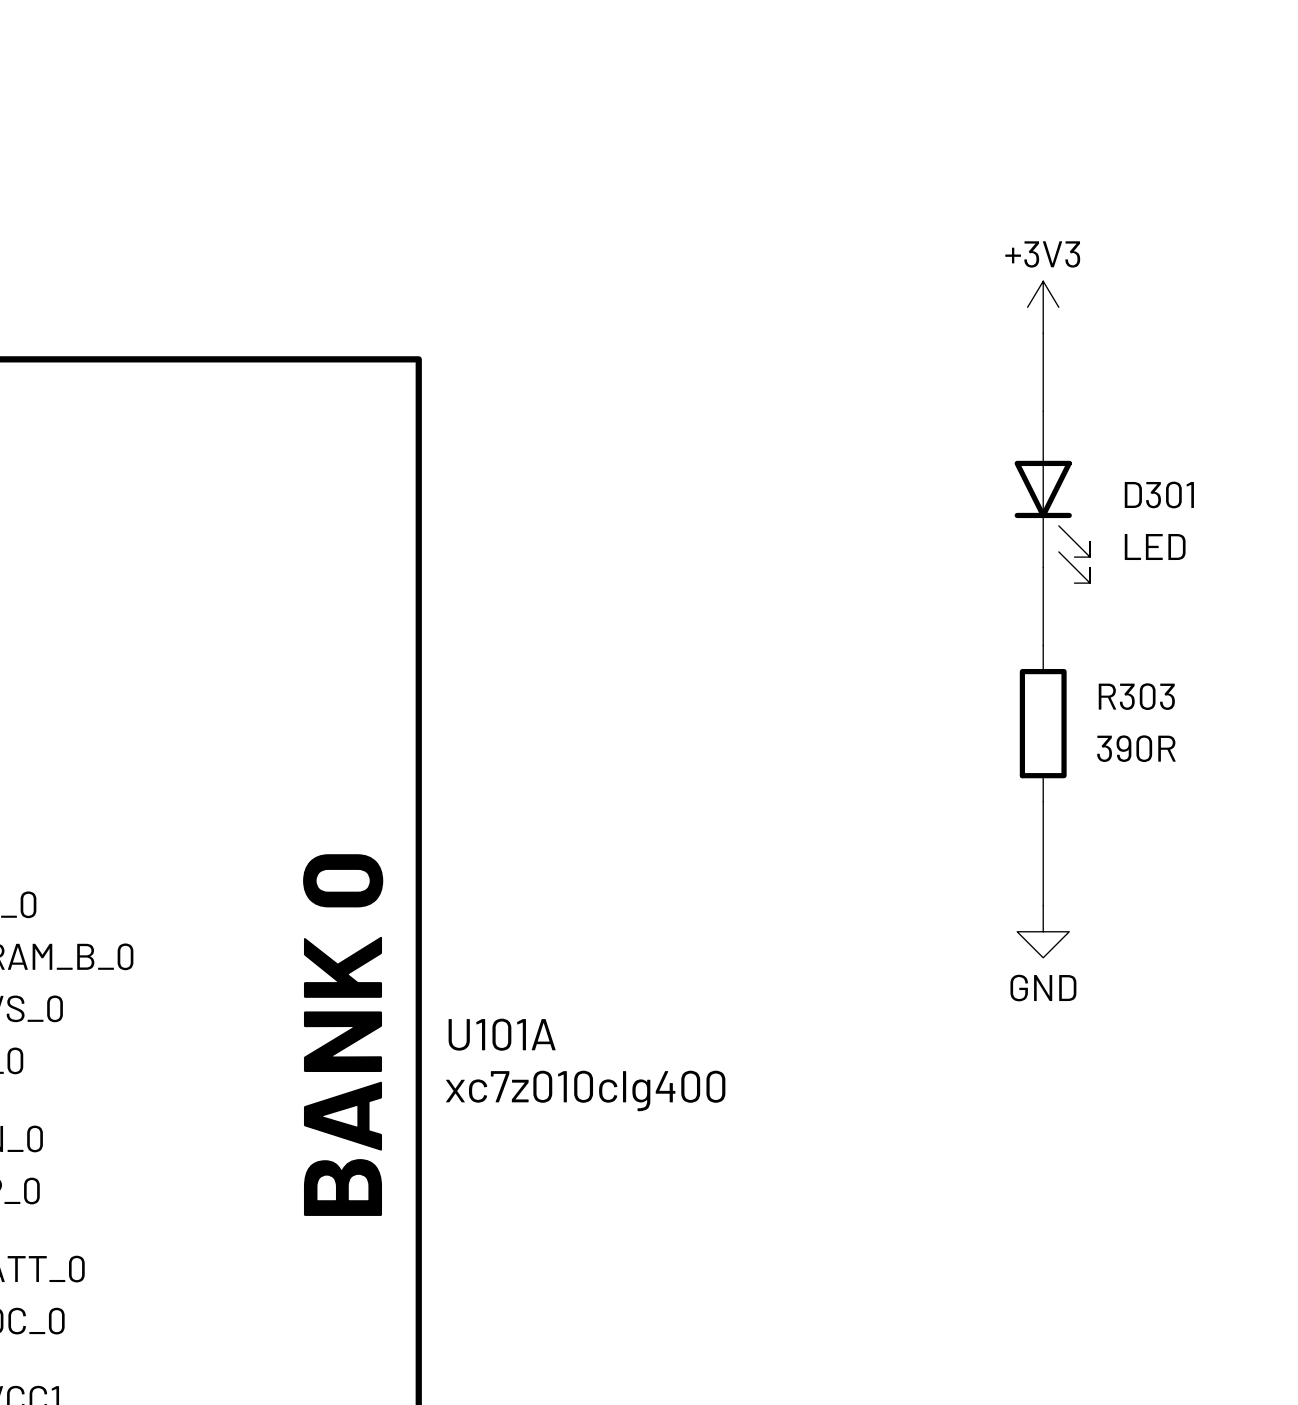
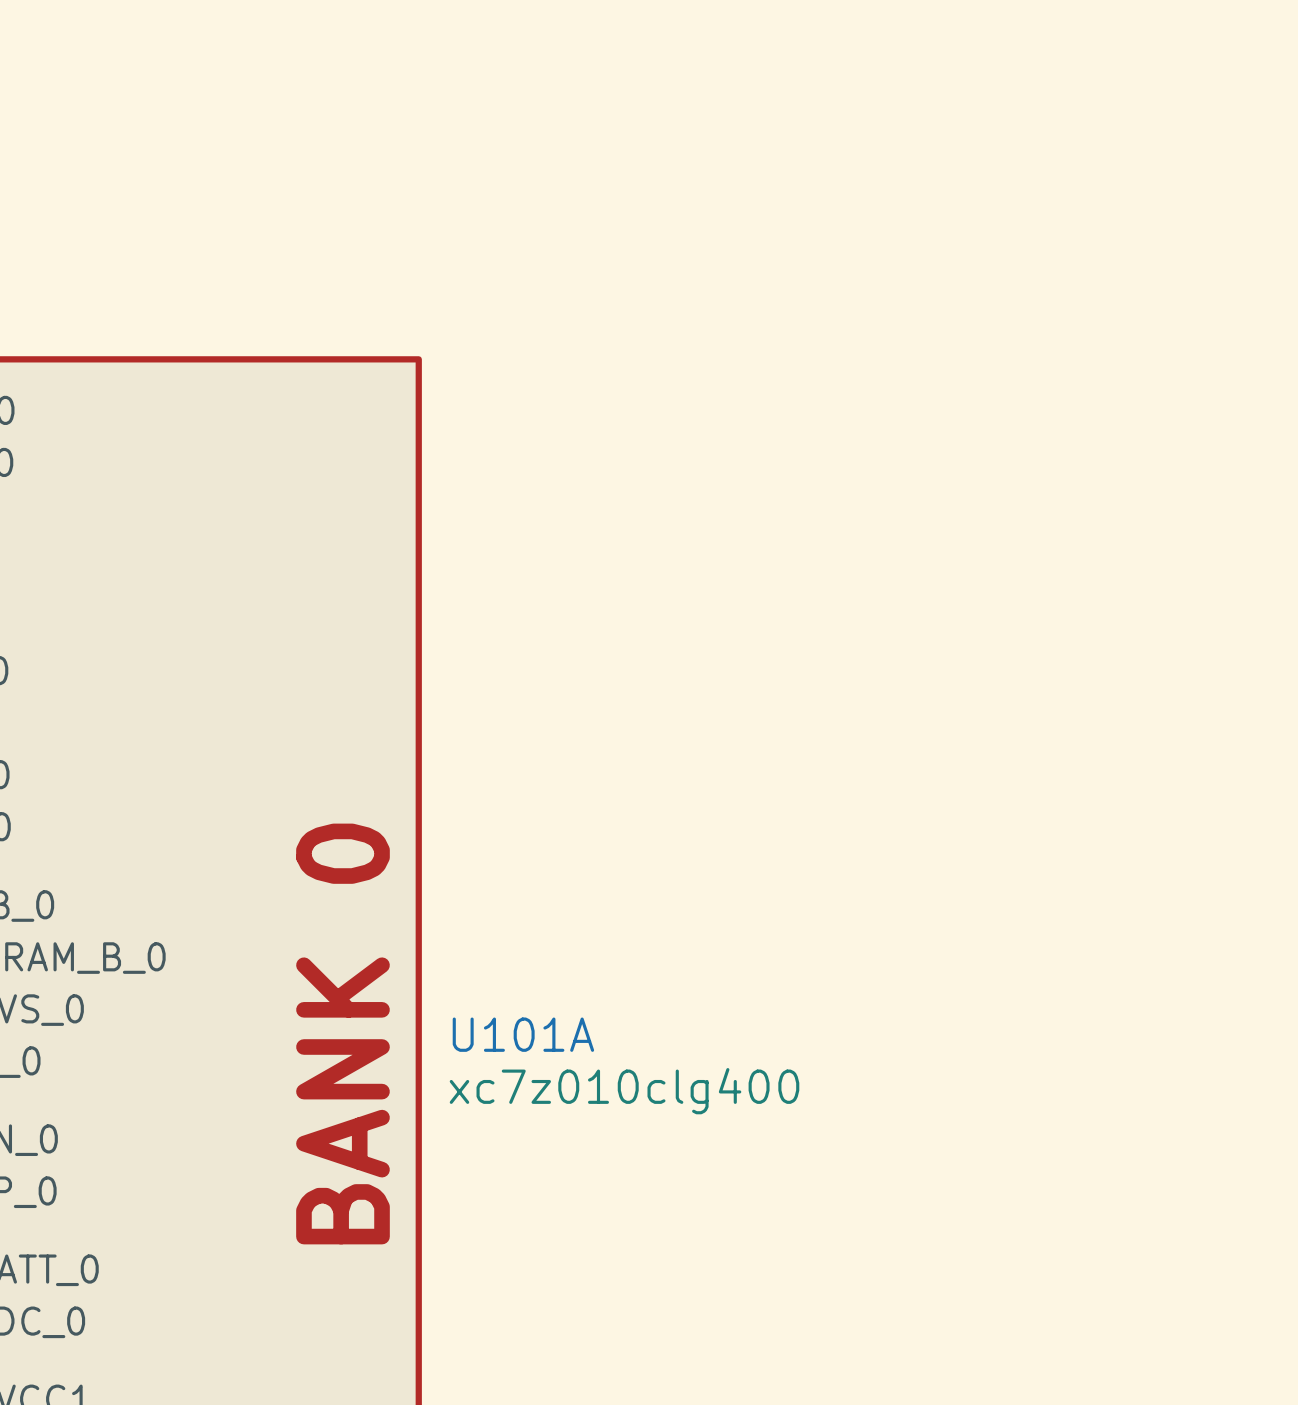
power symbol: +3V3 (1043, 307) -> none
wire: (1043, 333) (1043, 411) -> none
D301: LED (1052, 497) -> none
wire: (1043, 567) (1043, 645) -> none
R303: 390R (1043, 723) -> none
wire: (1043, 801) (1043, 905) -> none
power symbol: GND (1043, 931) -> none

